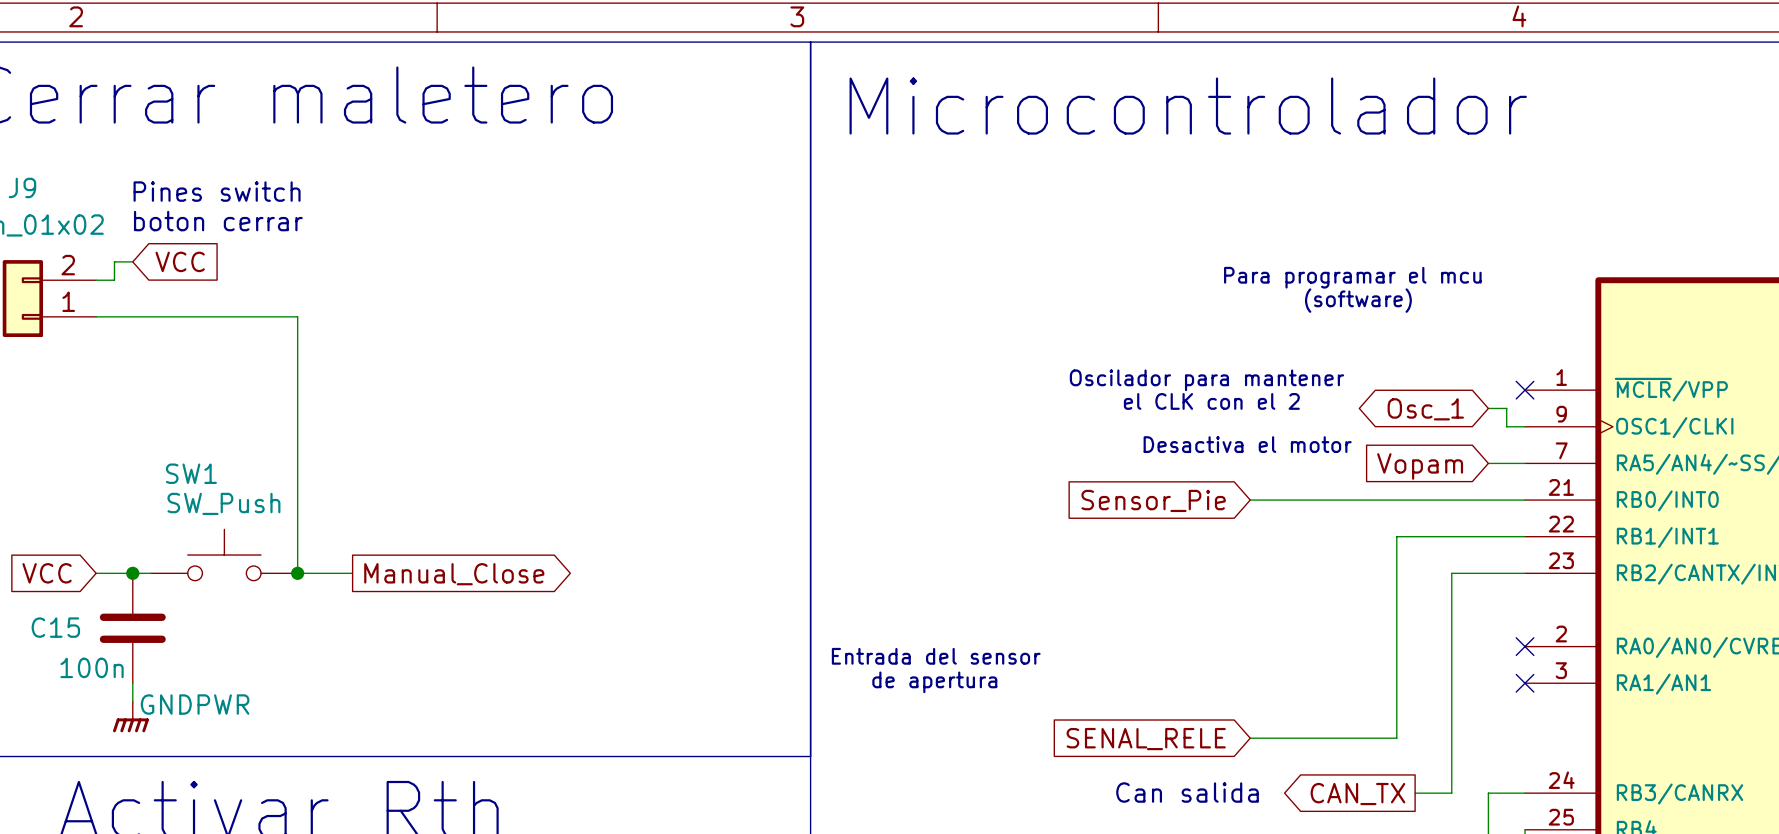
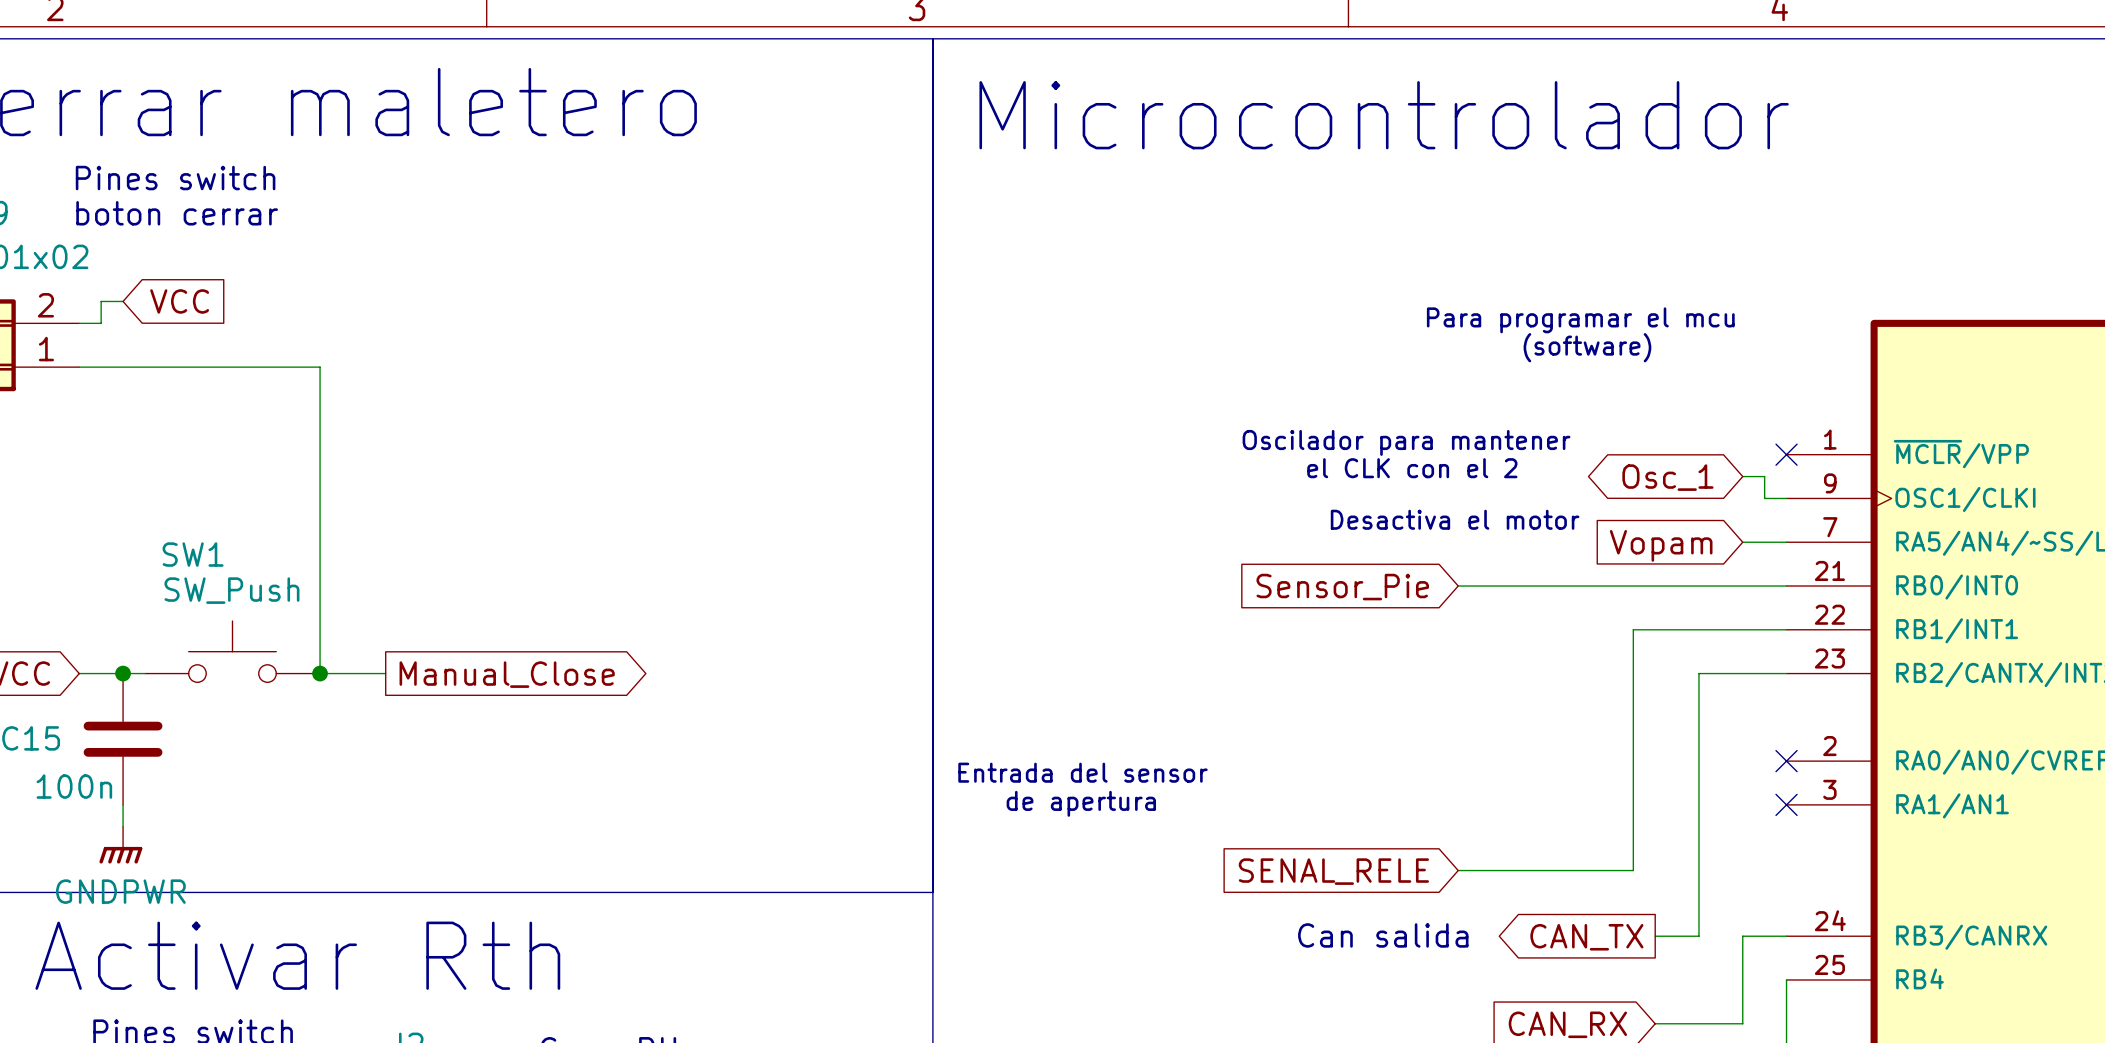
text position: Pines switch (217, 191) -> Pines switch (175, 178)
text position: boton cerrar (218, 221) -> boton cerrar (177, 213)
power symbol text position: GNDPWR (195, 704) -> GNDPWR (120, 891)

